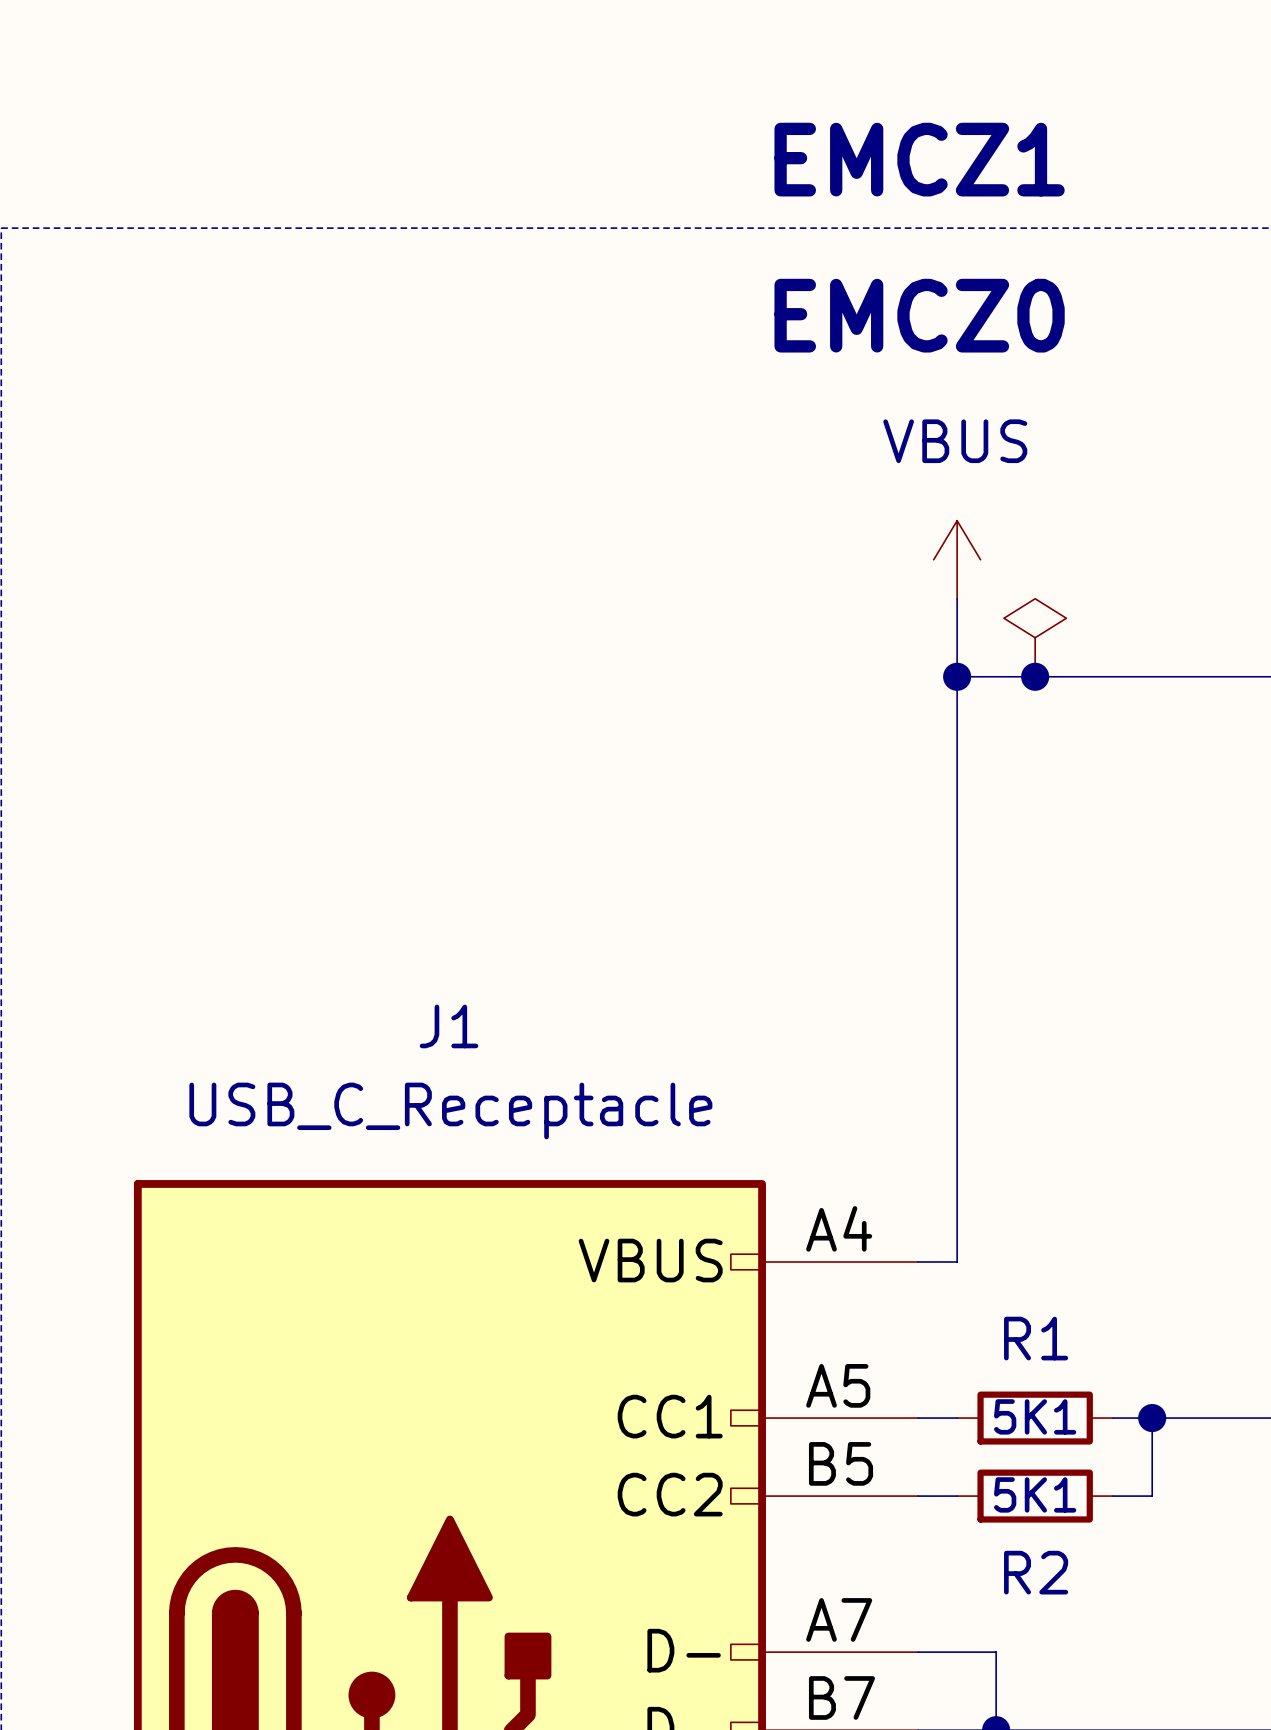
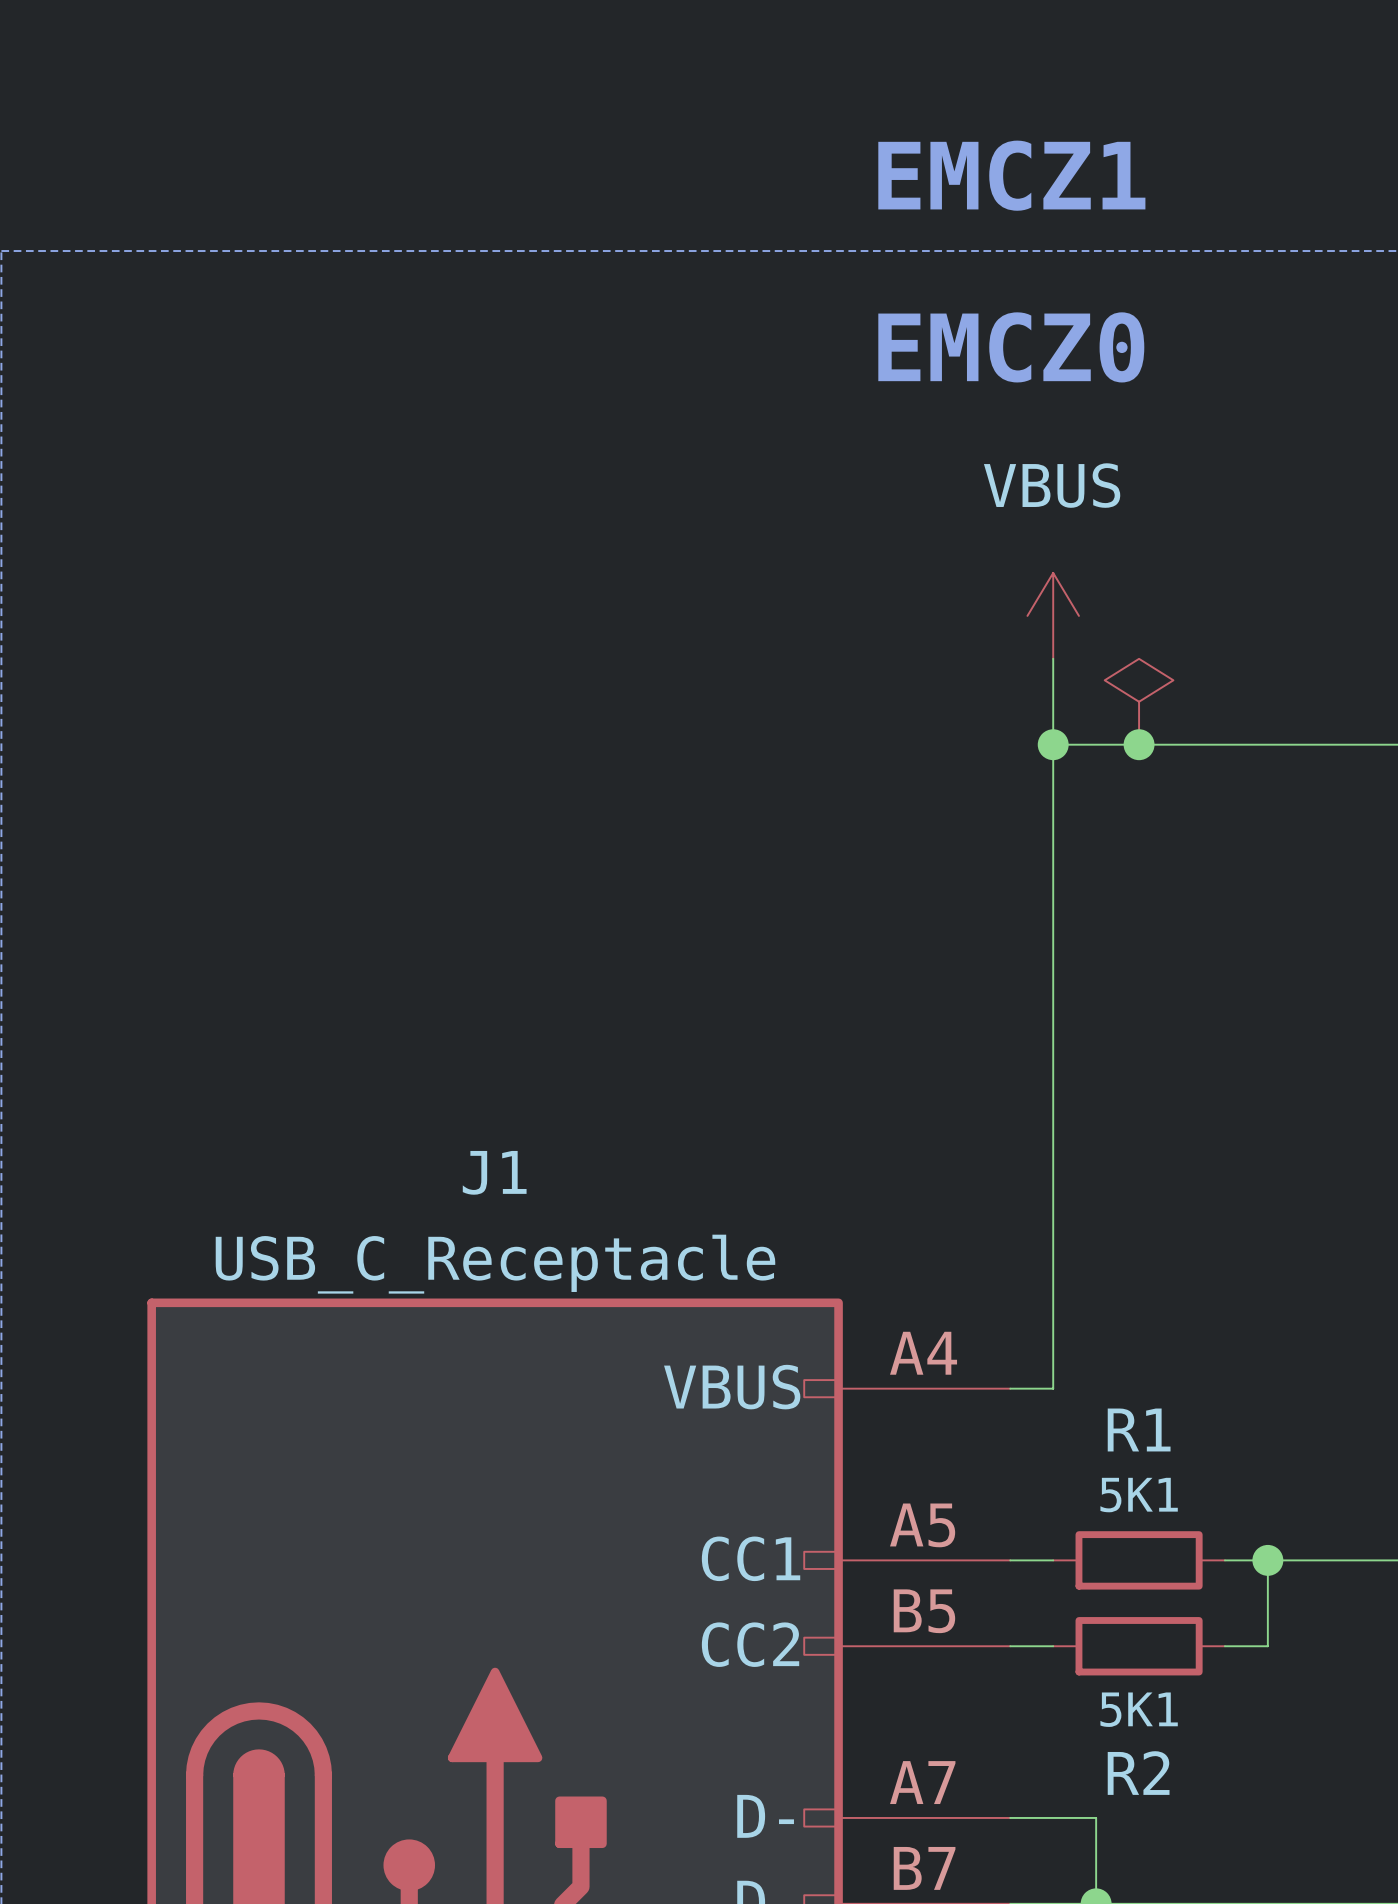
J1 name position: J1 (449, 1026) -> J1 (494, 1172)
J1 value position: USB_C_Receptacle (450, 1110) -> USB_C_Receptacle (495, 1264)
R1 name position: R1 (1036, 1338) -> R1 (1139, 1429)
R1 value position: 5K1 (1035, 1416) -> 5K1 (1139, 1495)
R2 value position: 5K1 (1035, 1494) -> 5K1 (1139, 1709)
R2 name position: R2 (1036, 1572) -> R2 (1138, 1773)

